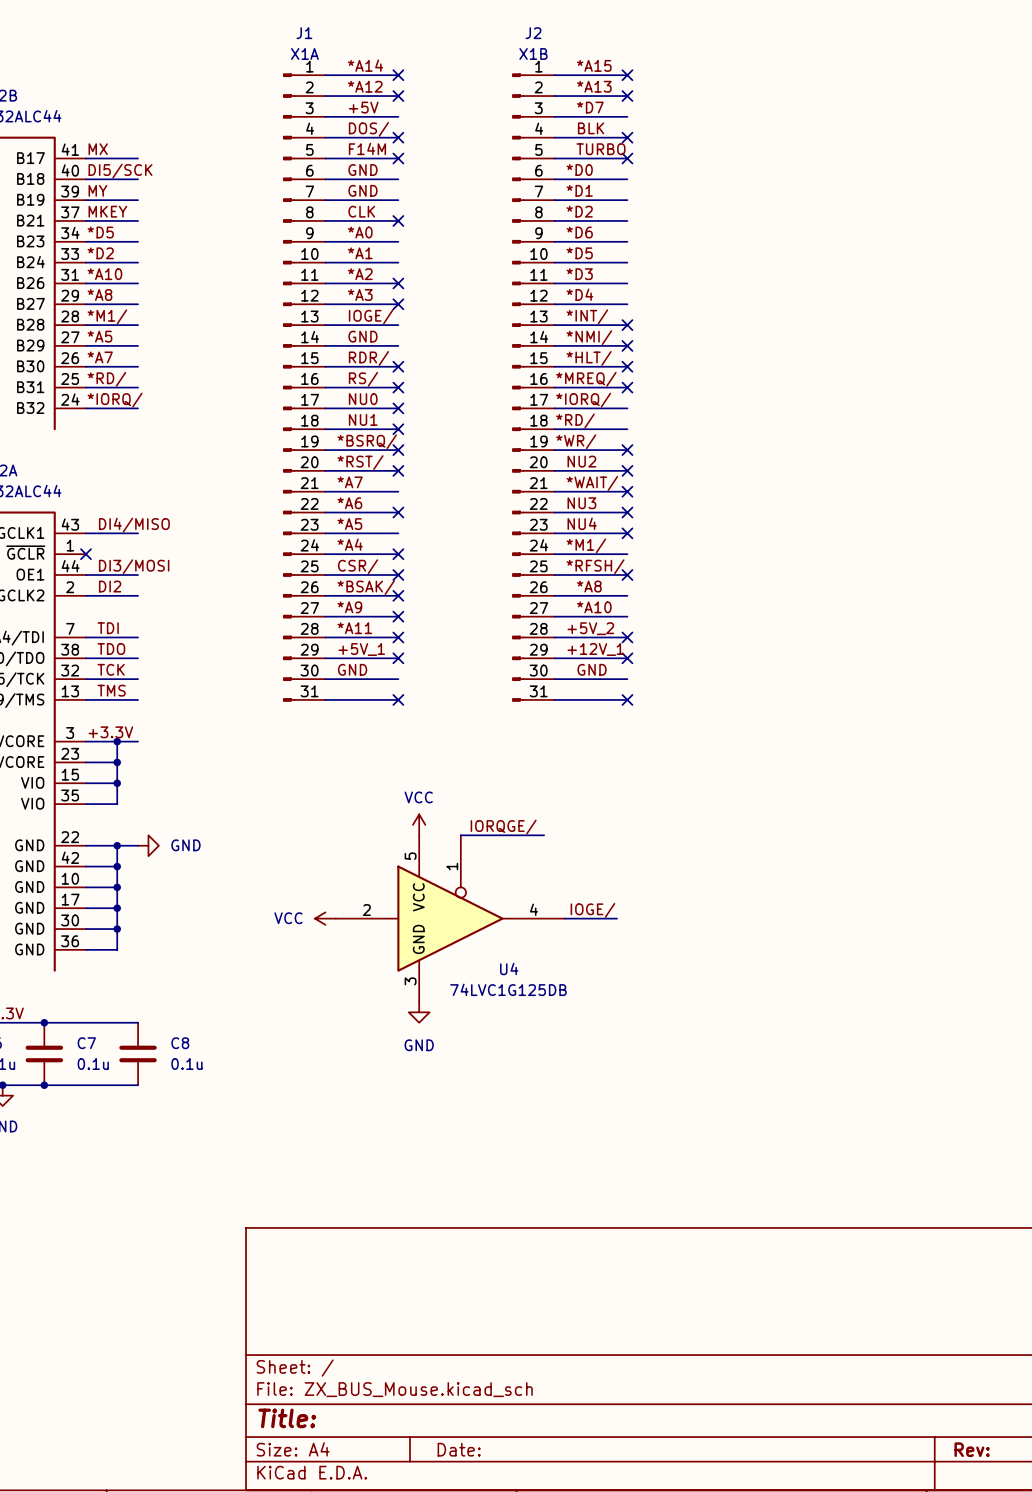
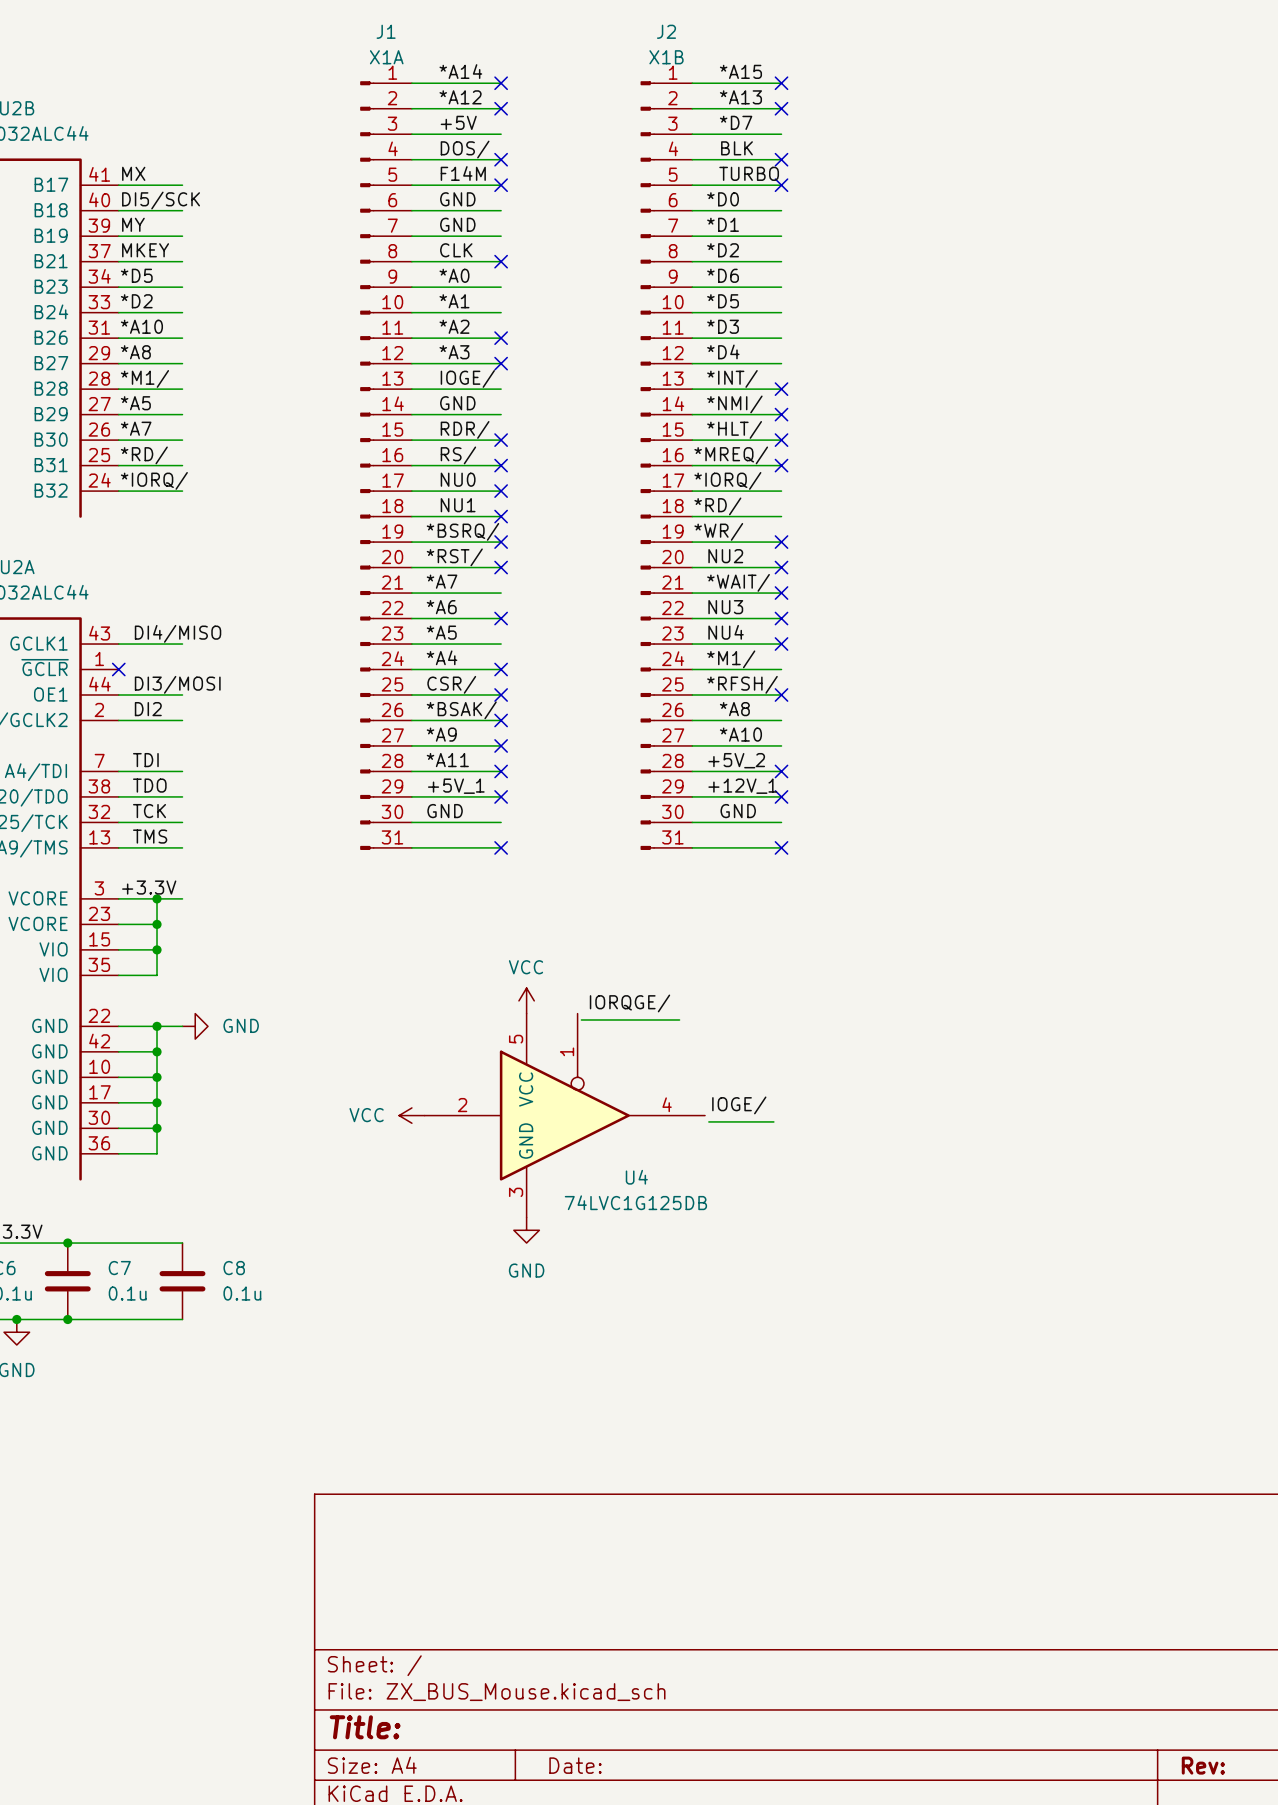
wire: (460, 835) (544, 835) -> none
wire: none -> (581, 1019) (679, 1019)
wire: (564, 918) (617, 918) -> none
wire: none -> (708, 1121) (773, 1121)

